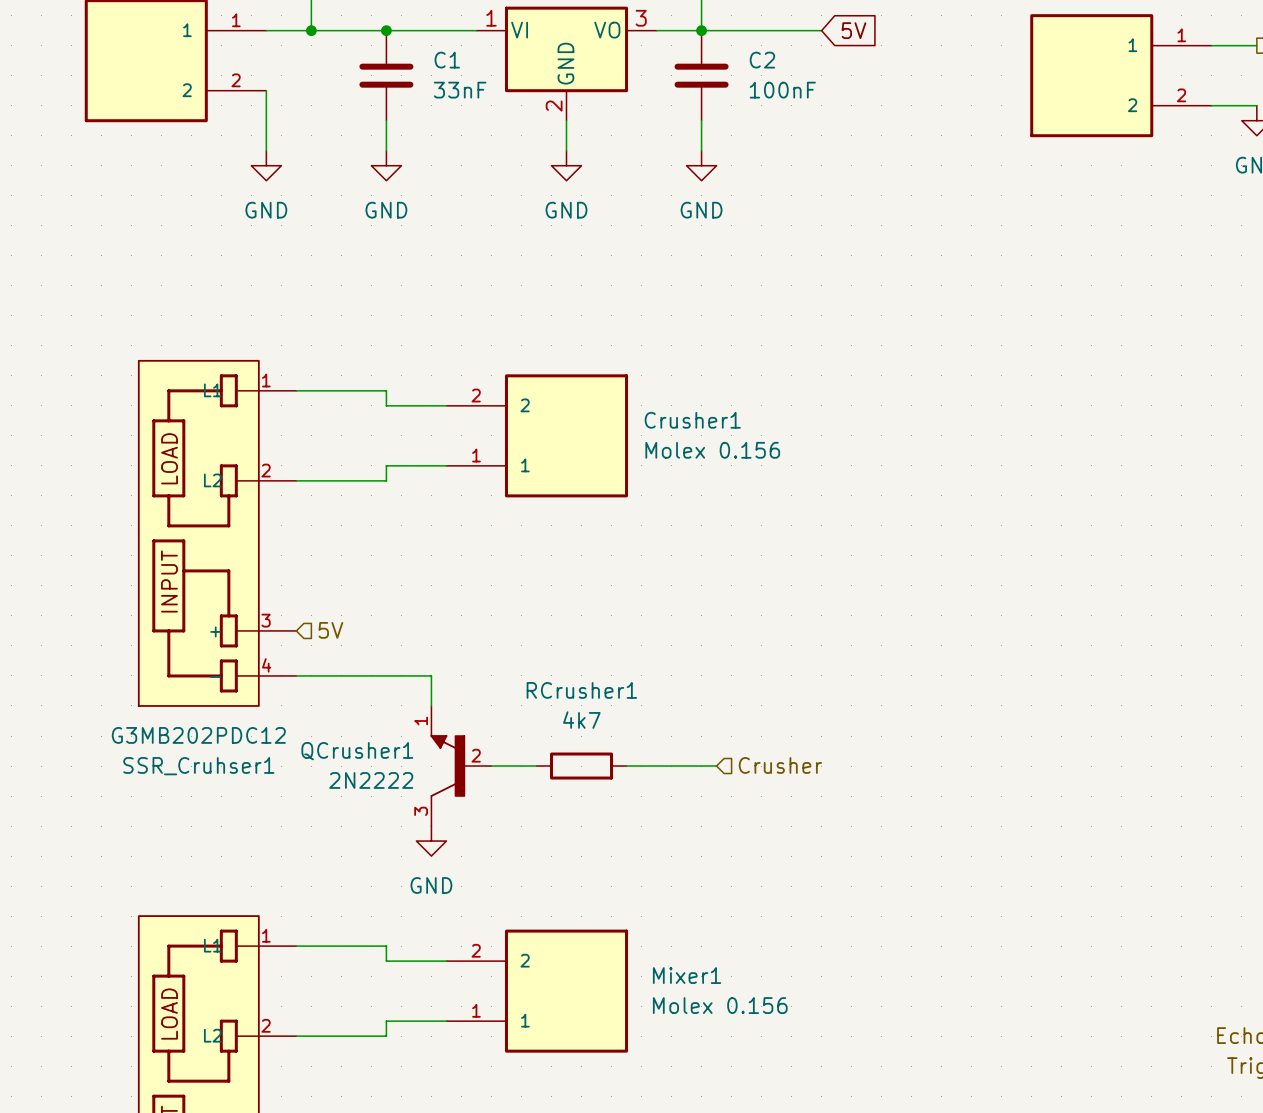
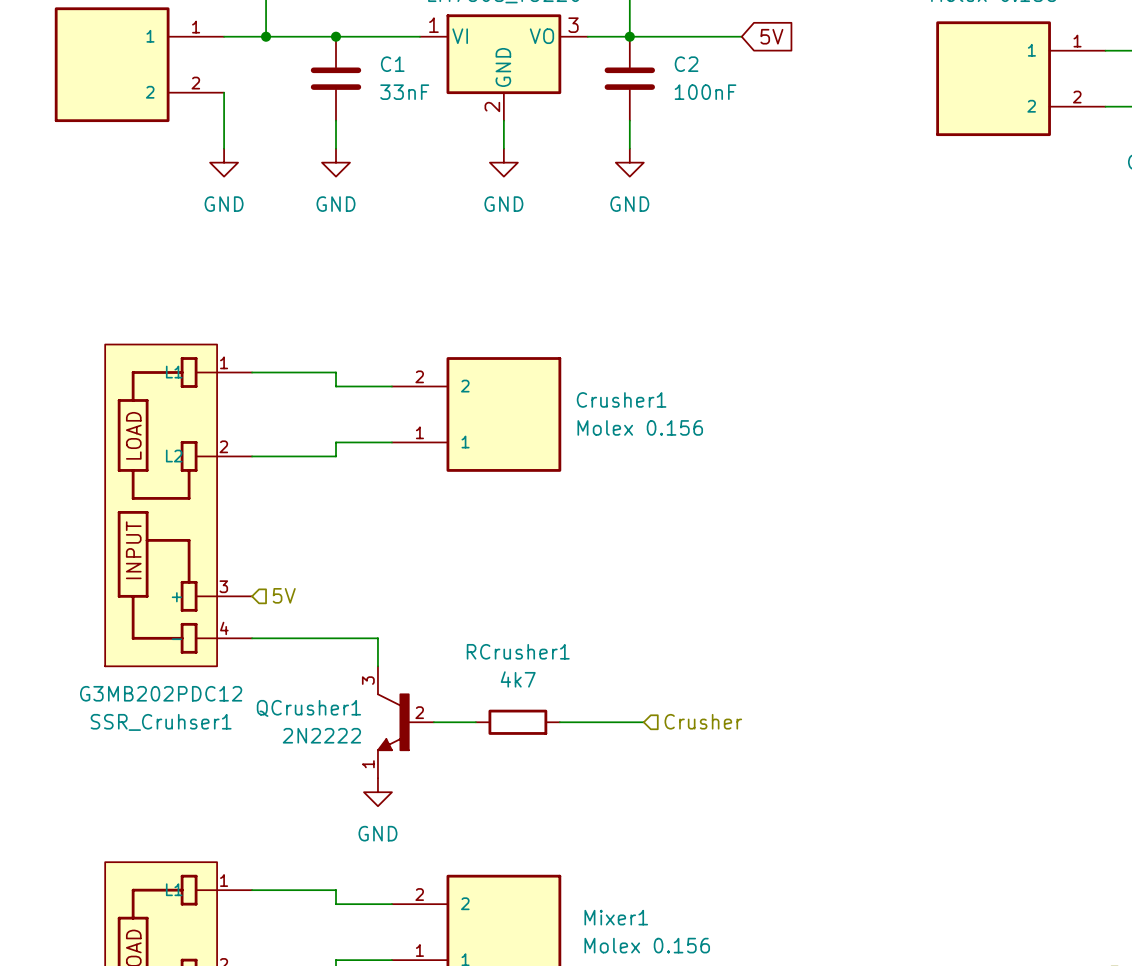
QCrusher1 flip: as is (447, 766) -> up-down (393, 722)

